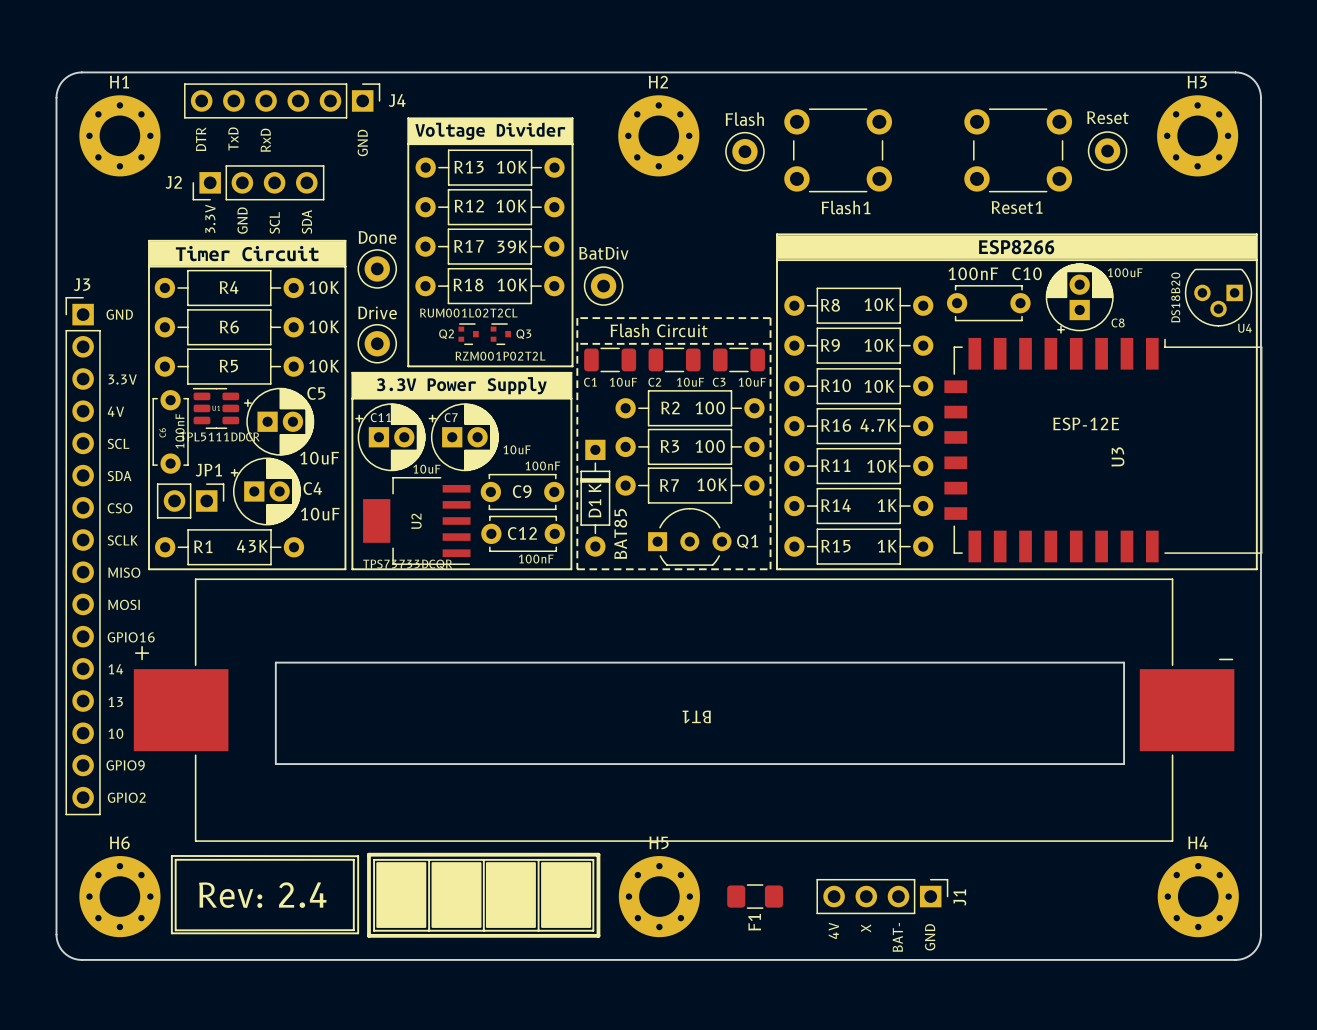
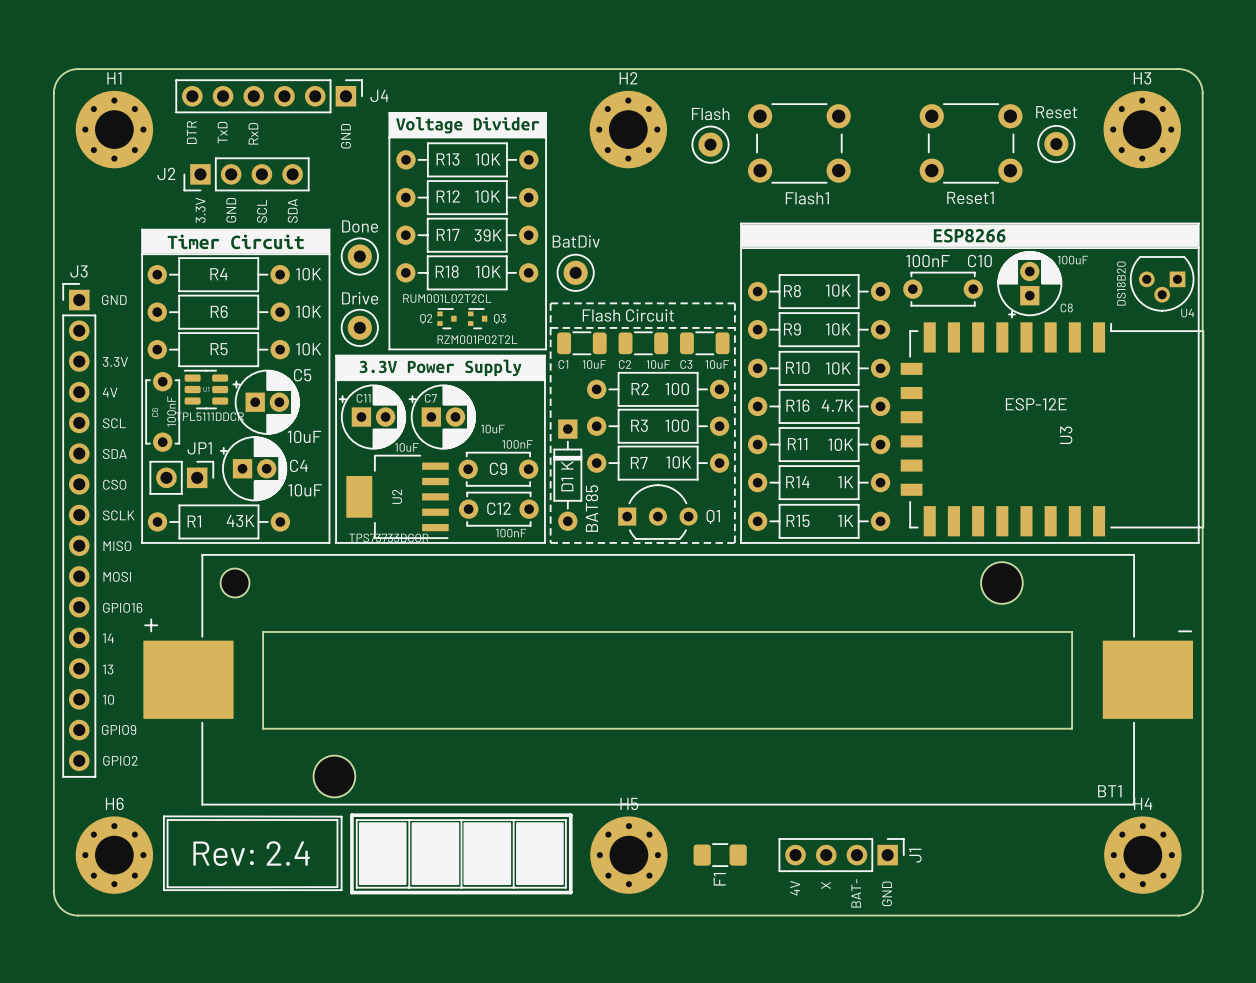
BT1 footprint: [133, 578, 1235, 842] -> [143, 554, 1193, 806]
BT1 name position: BT1 (696, 716) -> BT1 (1109, 791)

